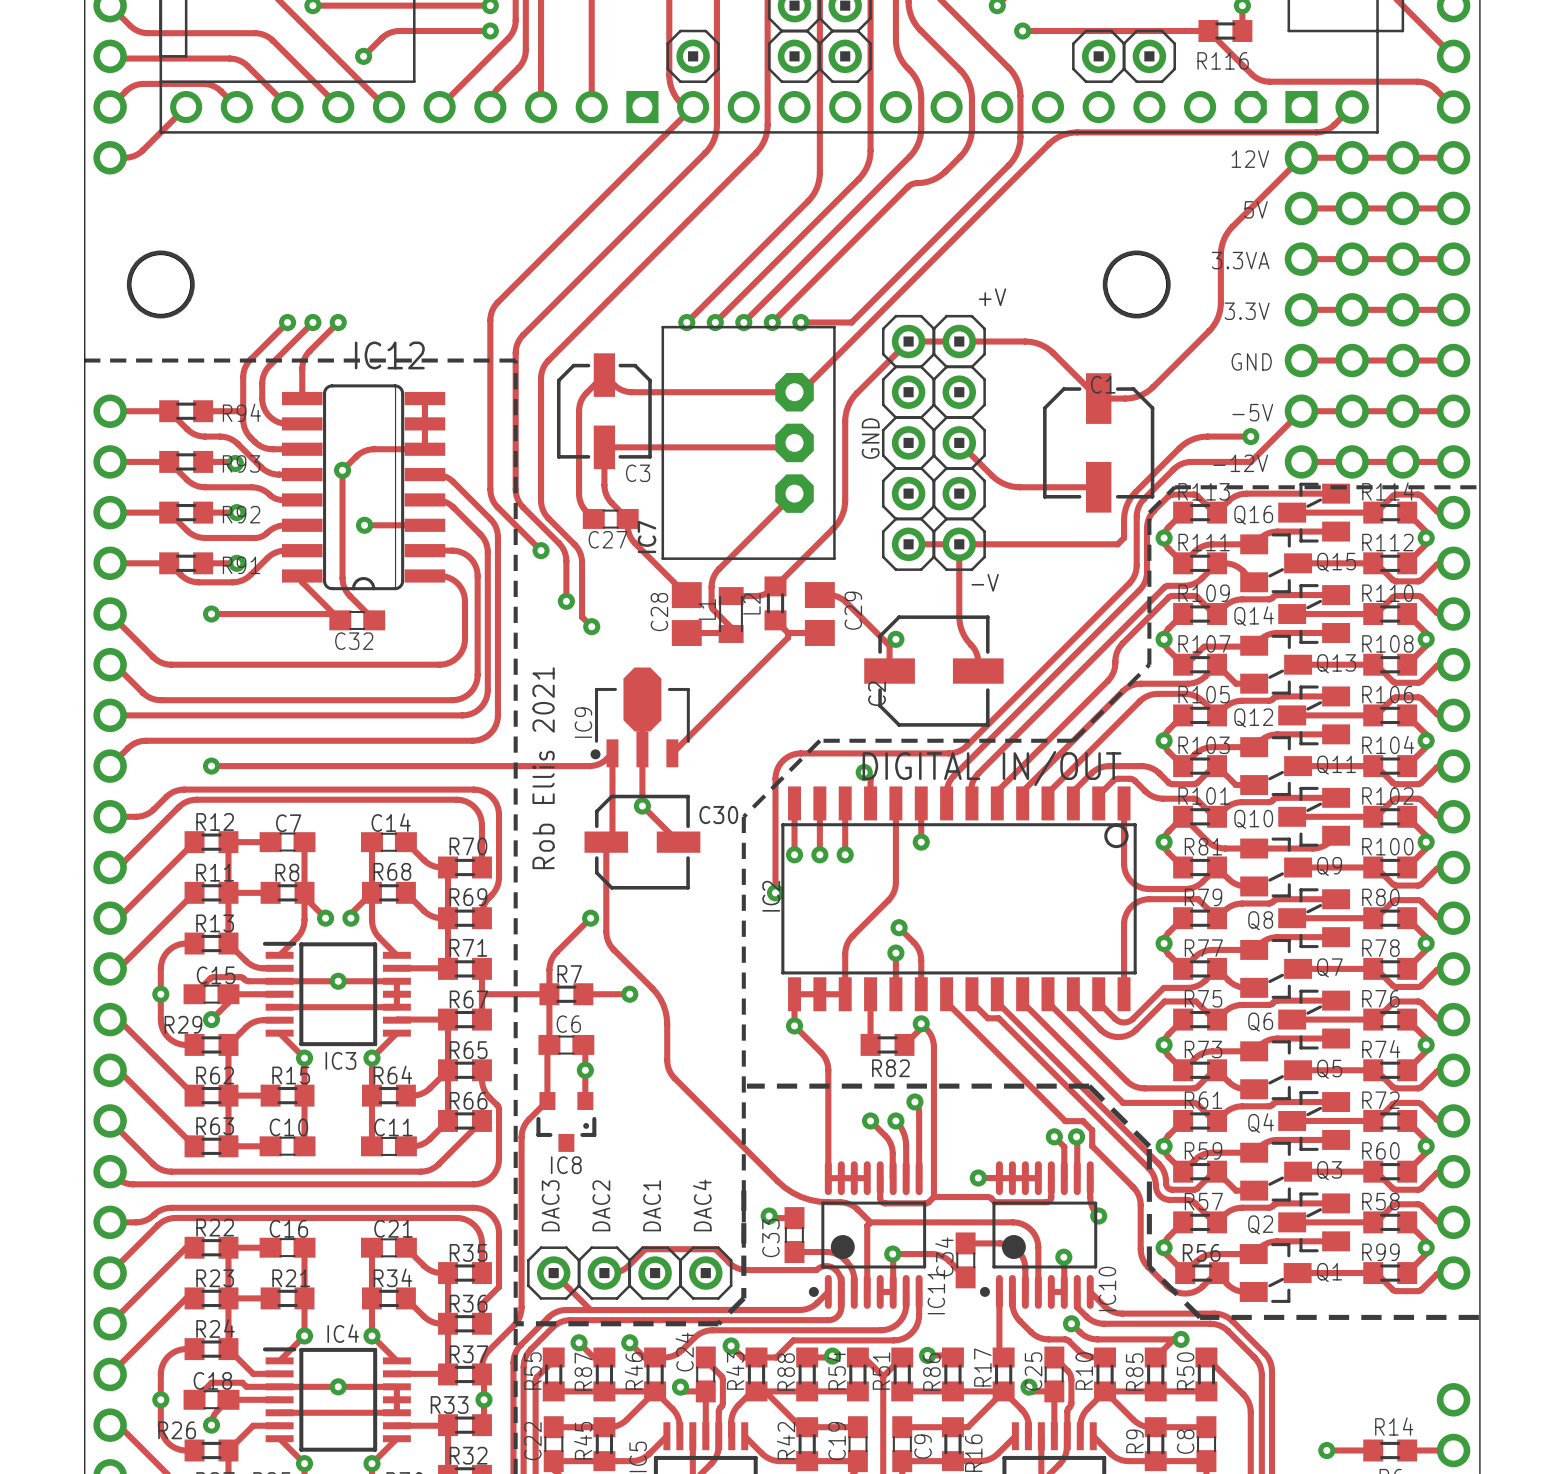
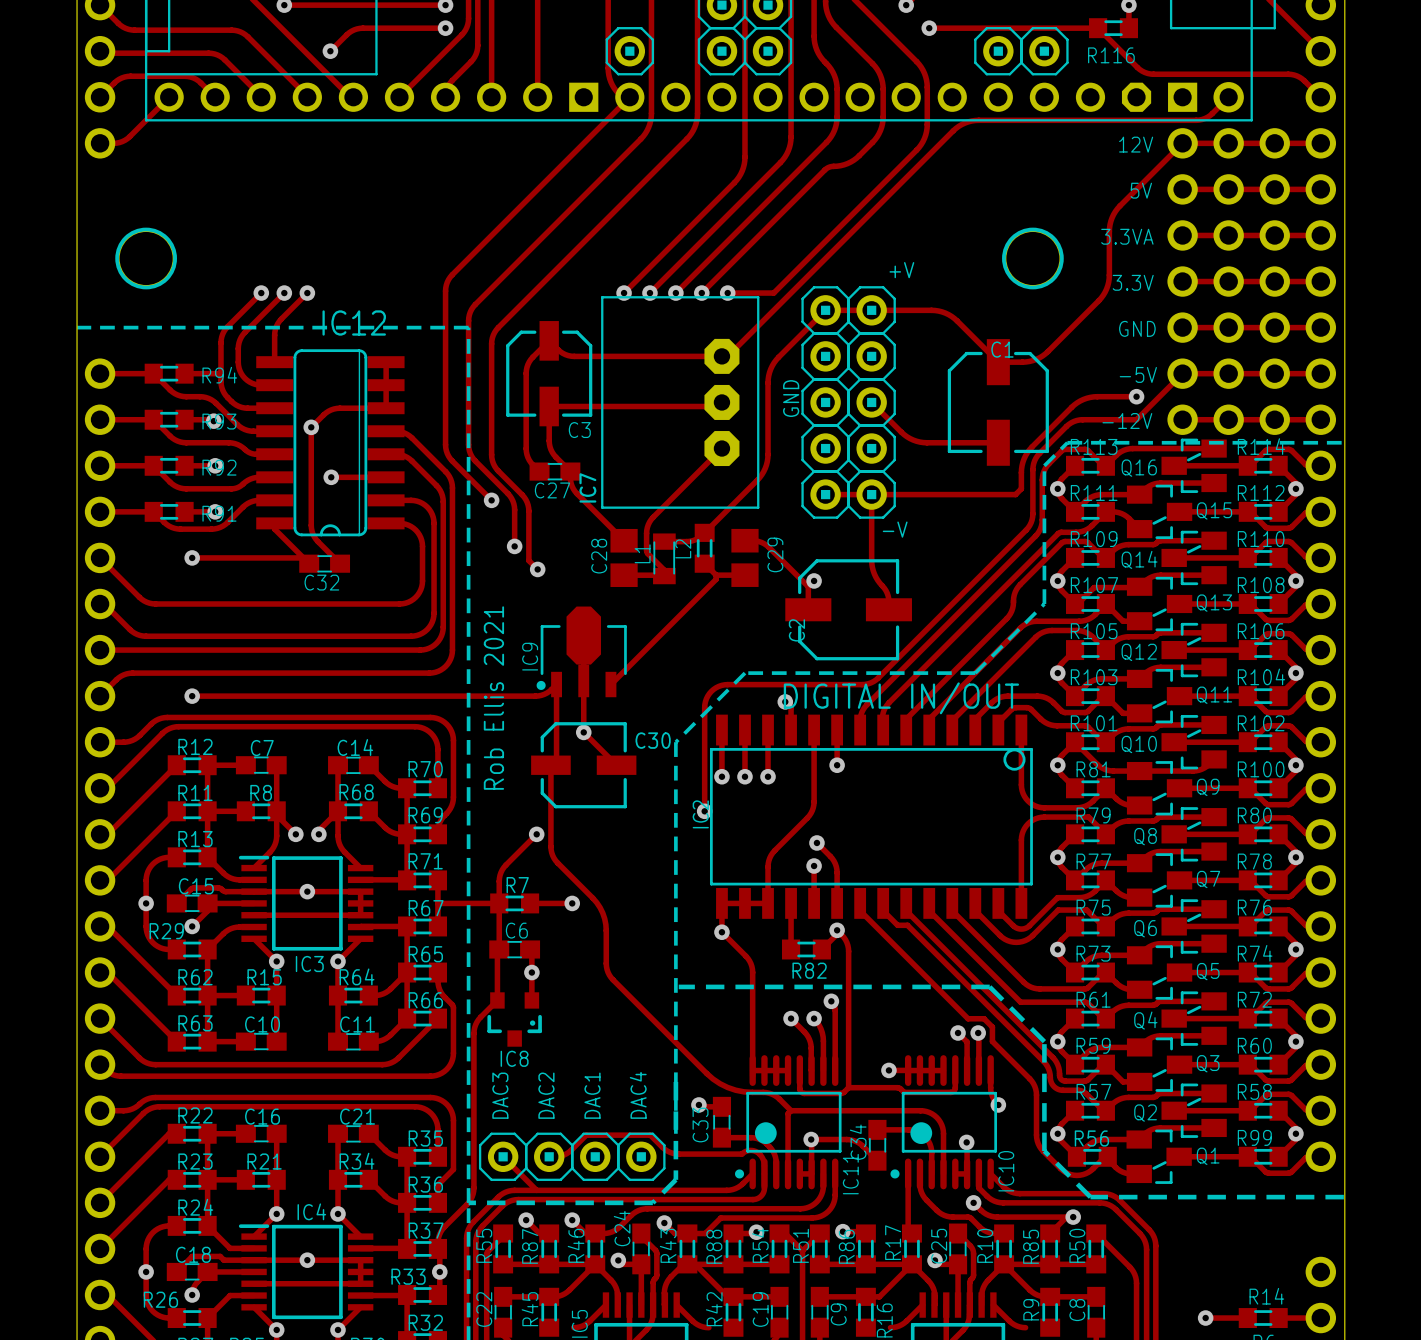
track: (553, 1461) (631, 1461) -> none
track: (780, 1461) (857, 1461) -> none
track: (902, 1461) (980, 1461) -> none
track: (1128, 1461) (1206, 1461) -> none

